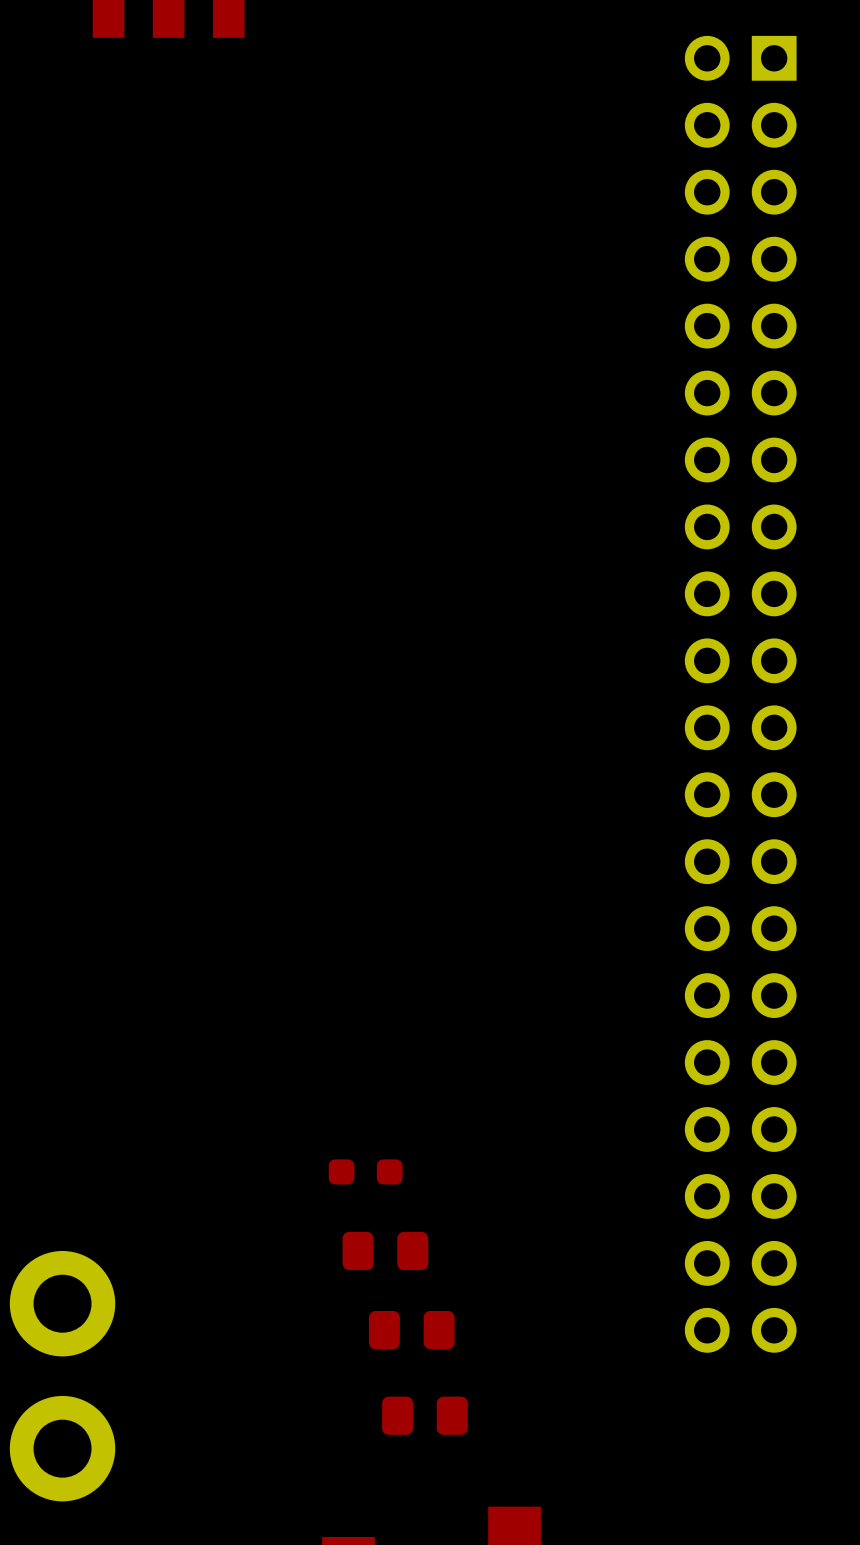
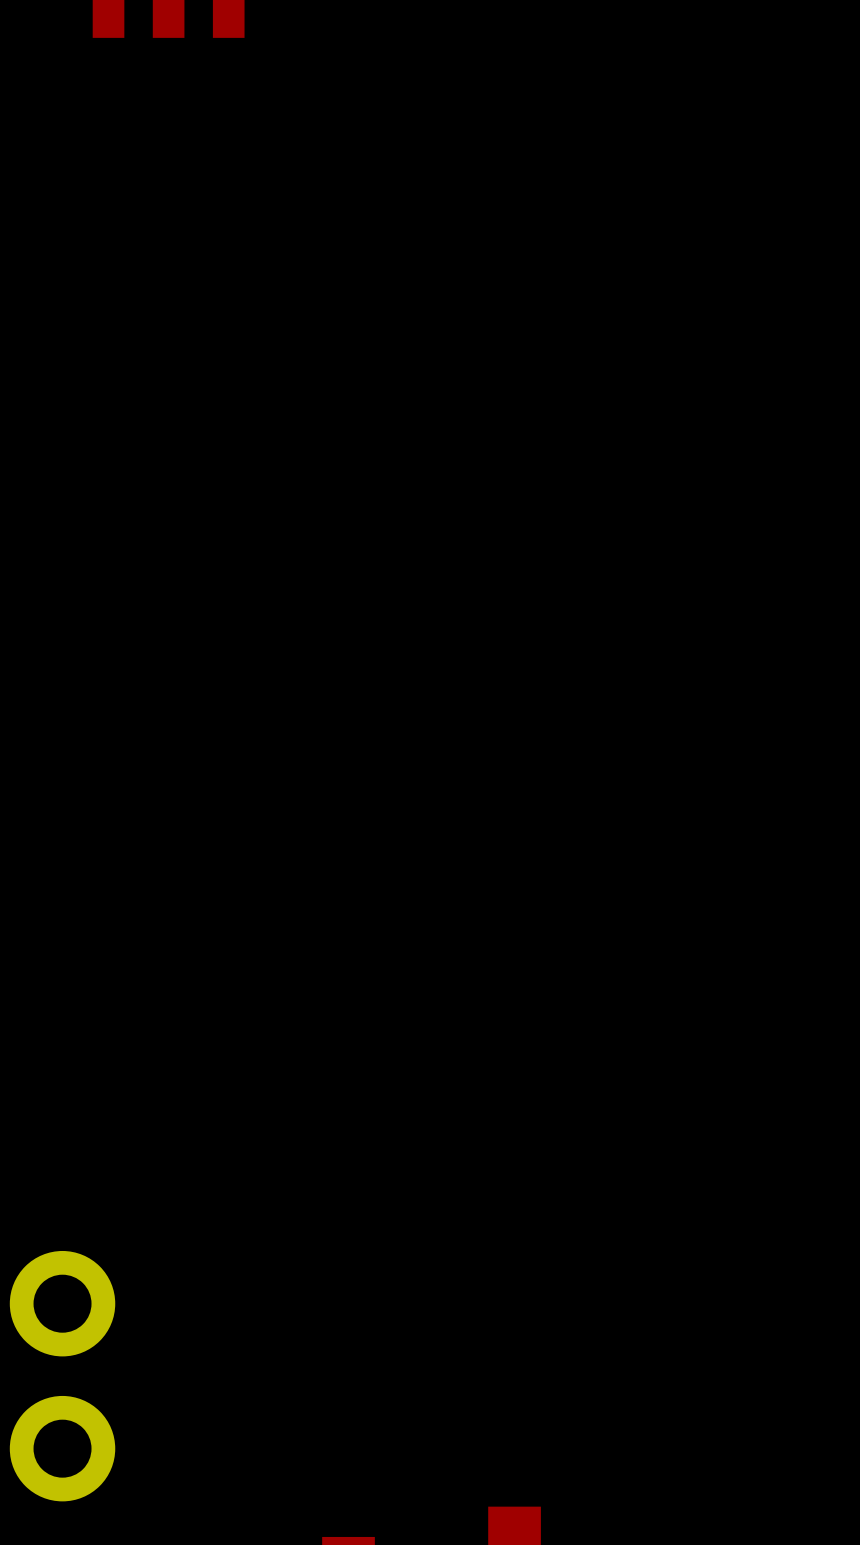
part: (740, 694) -> none
part: (365, 1171) -> none
part: (385, 1250) -> none
part: (411, 1330) -> none
part: (424, 1415) -> none

